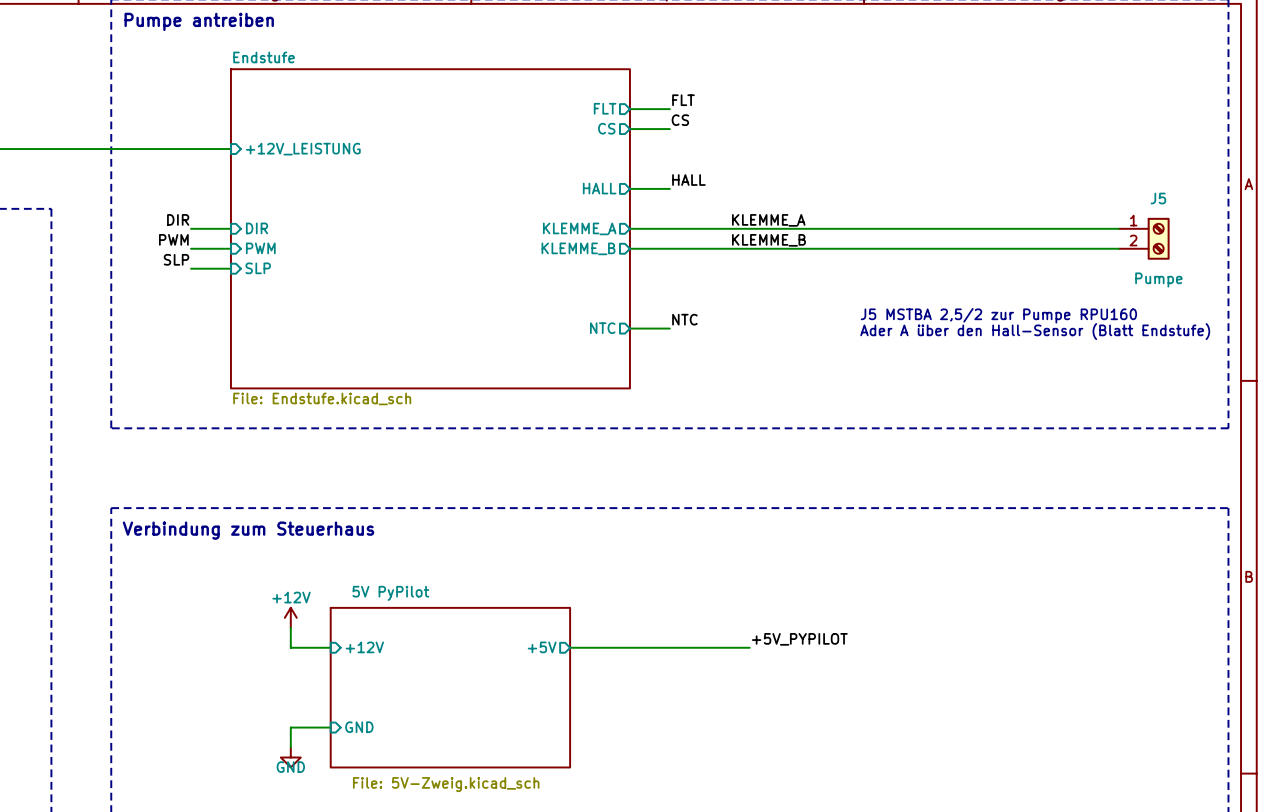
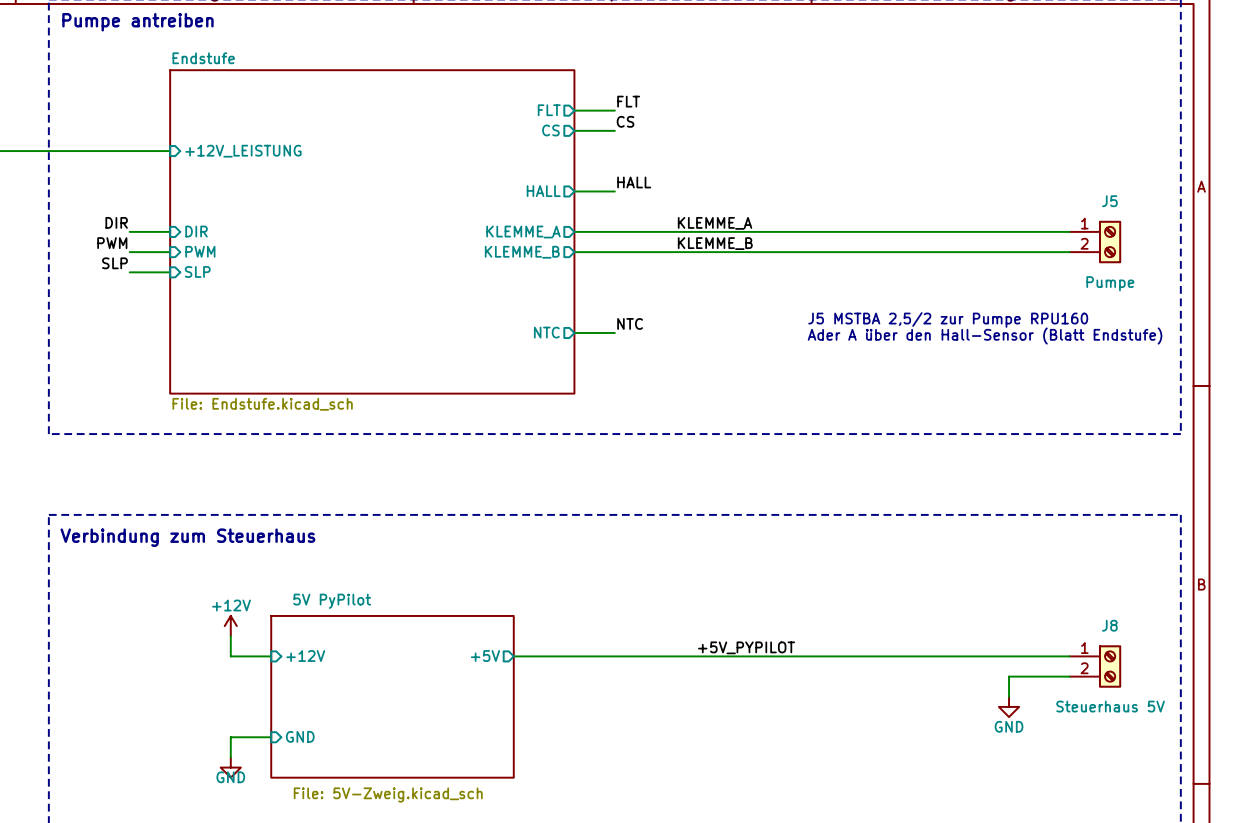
wire: none -> (695, 656) (1069, 656)
J8: none -> Steuerhaus 5V (1095, 666)
wire: none -> (1069, 676) (1009, 676) (1009, 696)
power symbol: none -> GND (1009, 706)

